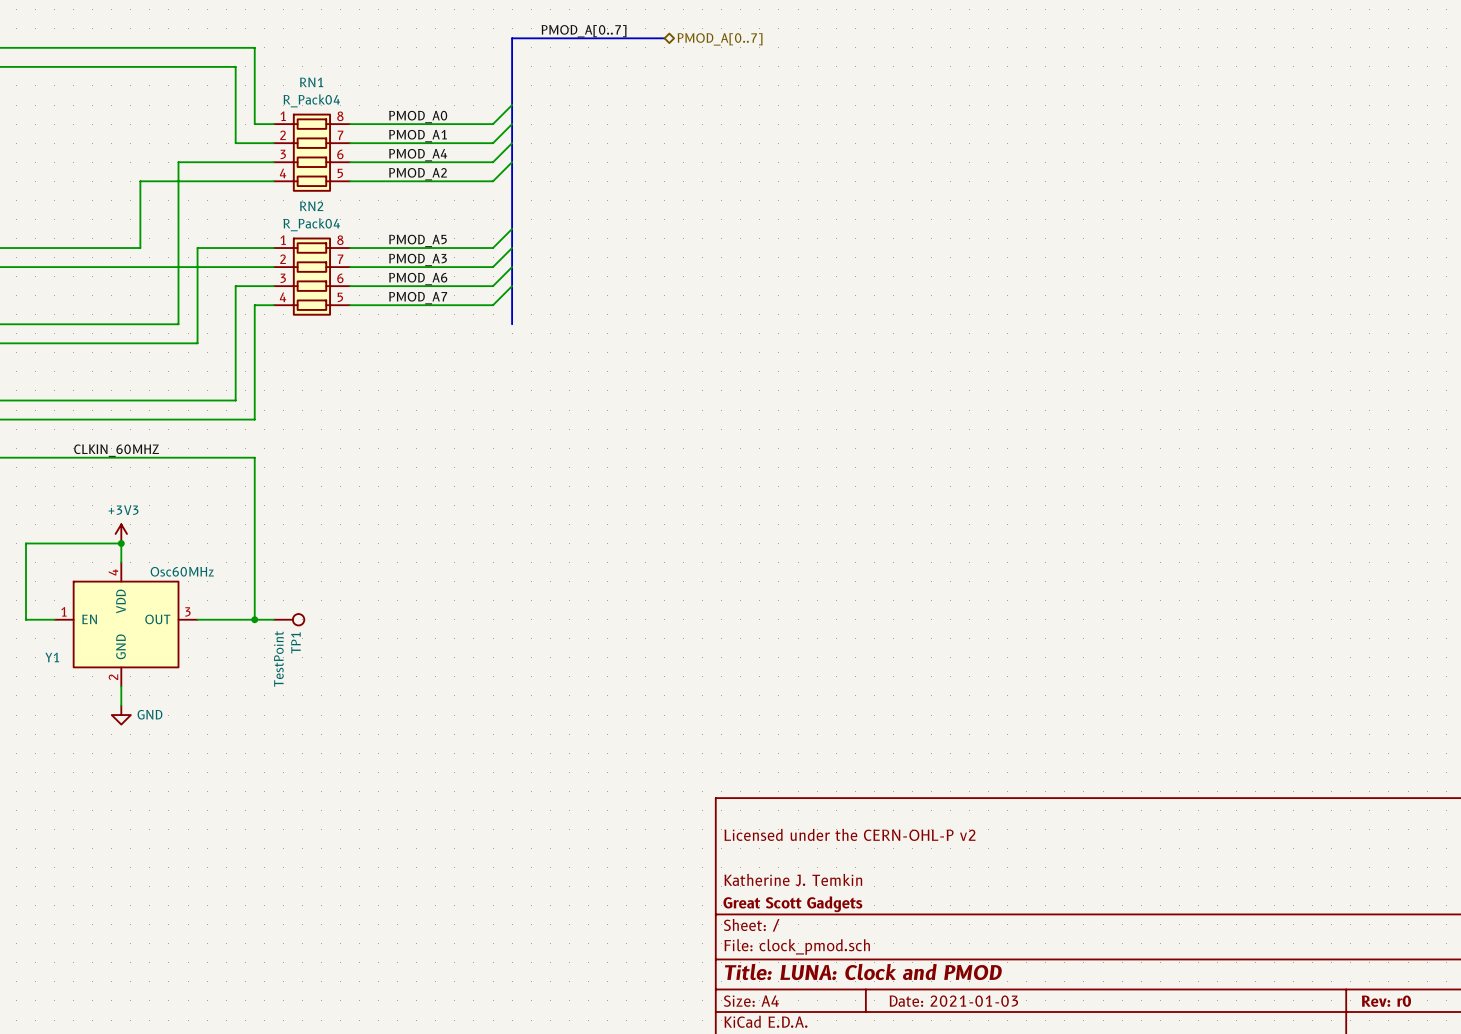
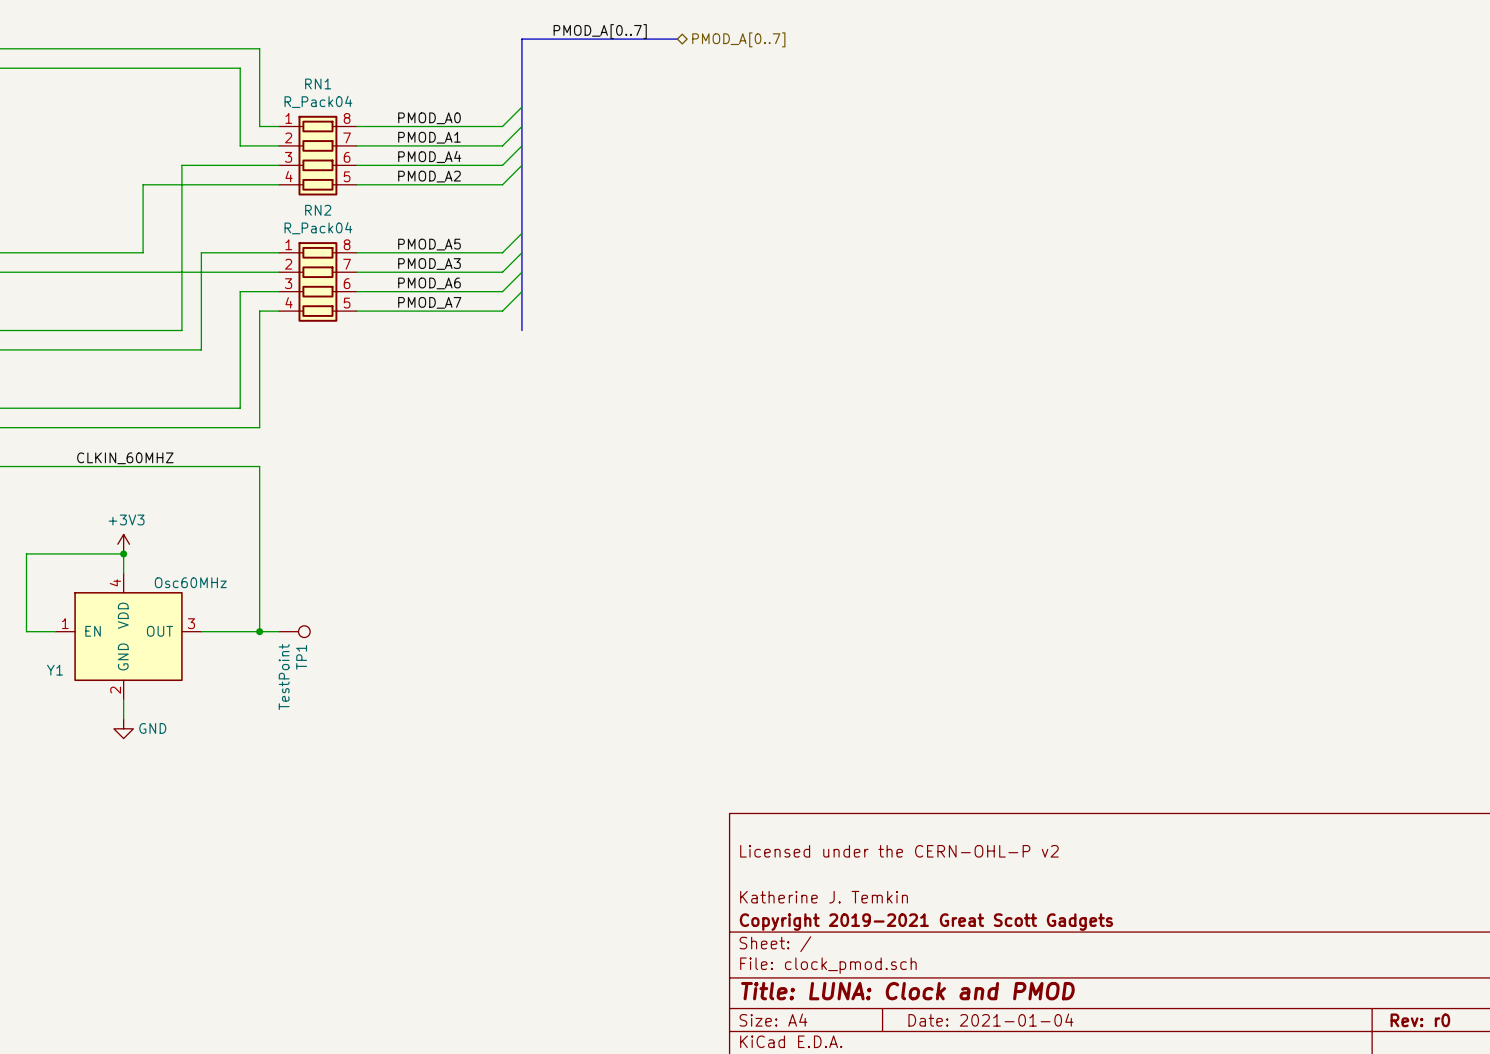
title block: Great Scott Gadgets (792, 904) -> Copyright 2019-2021 Great Scott Gadgets (926, 922)
title block: Date: 2021-01-03 (953, 1001) -> Date: 2021-01-04 (990, 1020)

